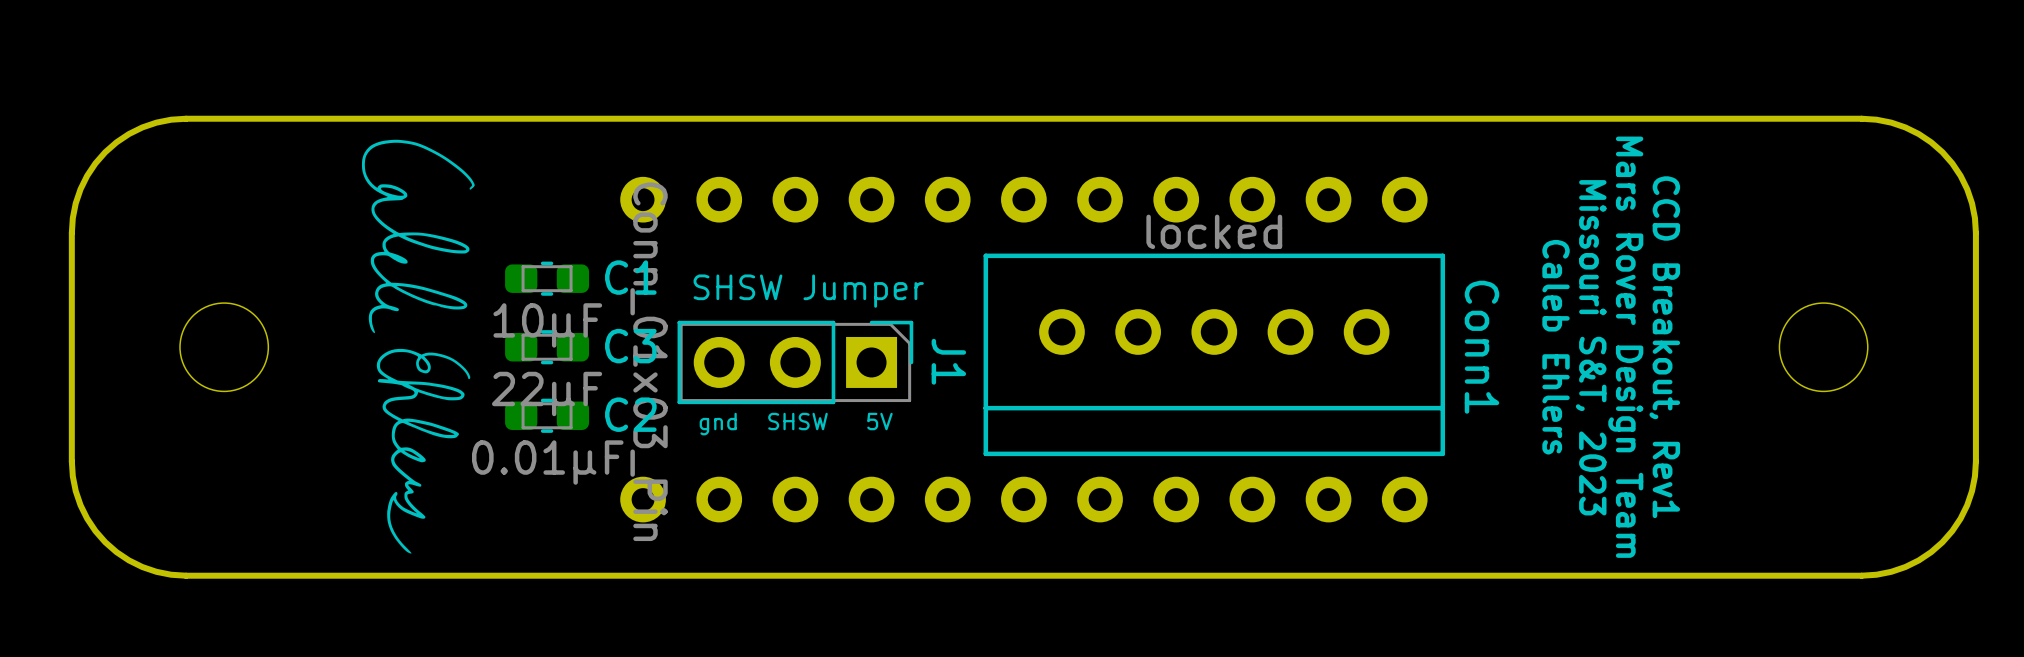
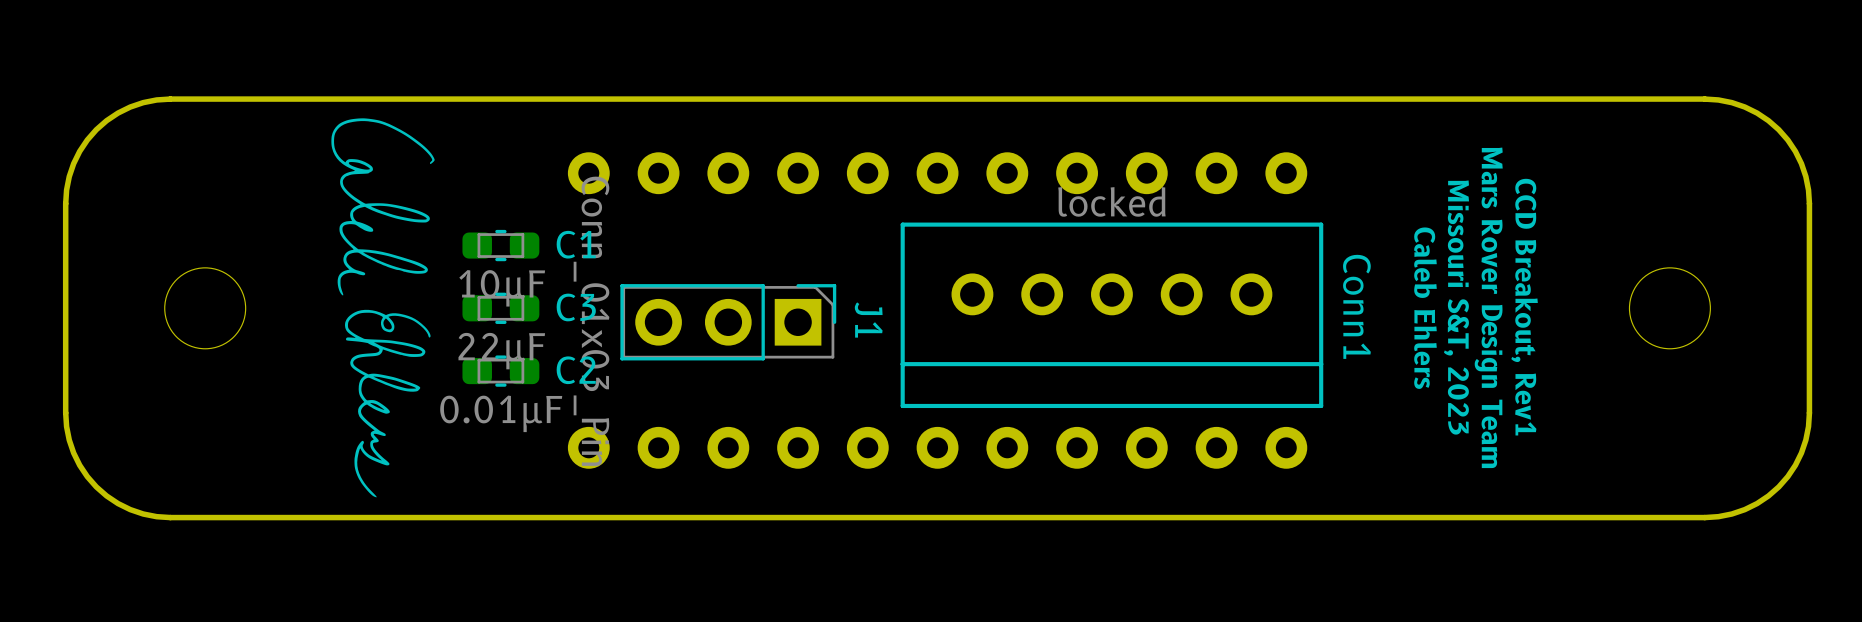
text: SHSW Jumper (808, 291) -> none
text: SHSW (797, 421) -> none
text: 5V (879, 421) -> none
text: gnd (718, 424) -> none

